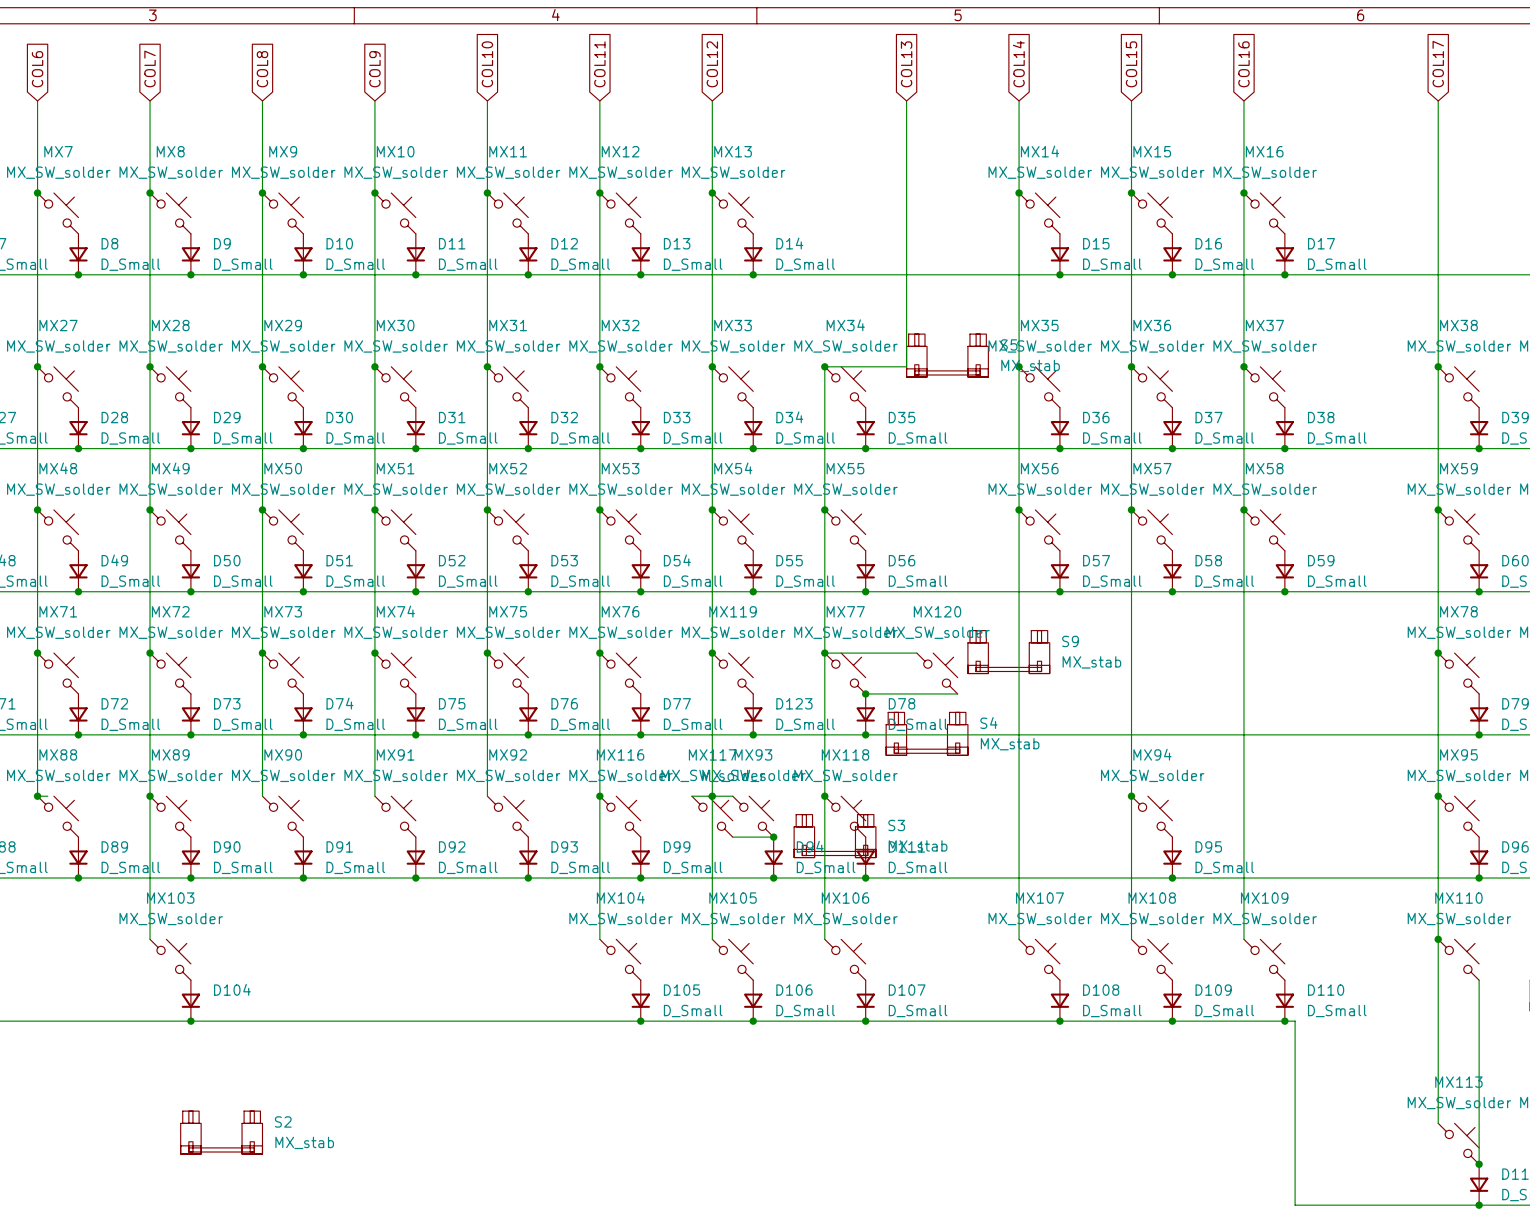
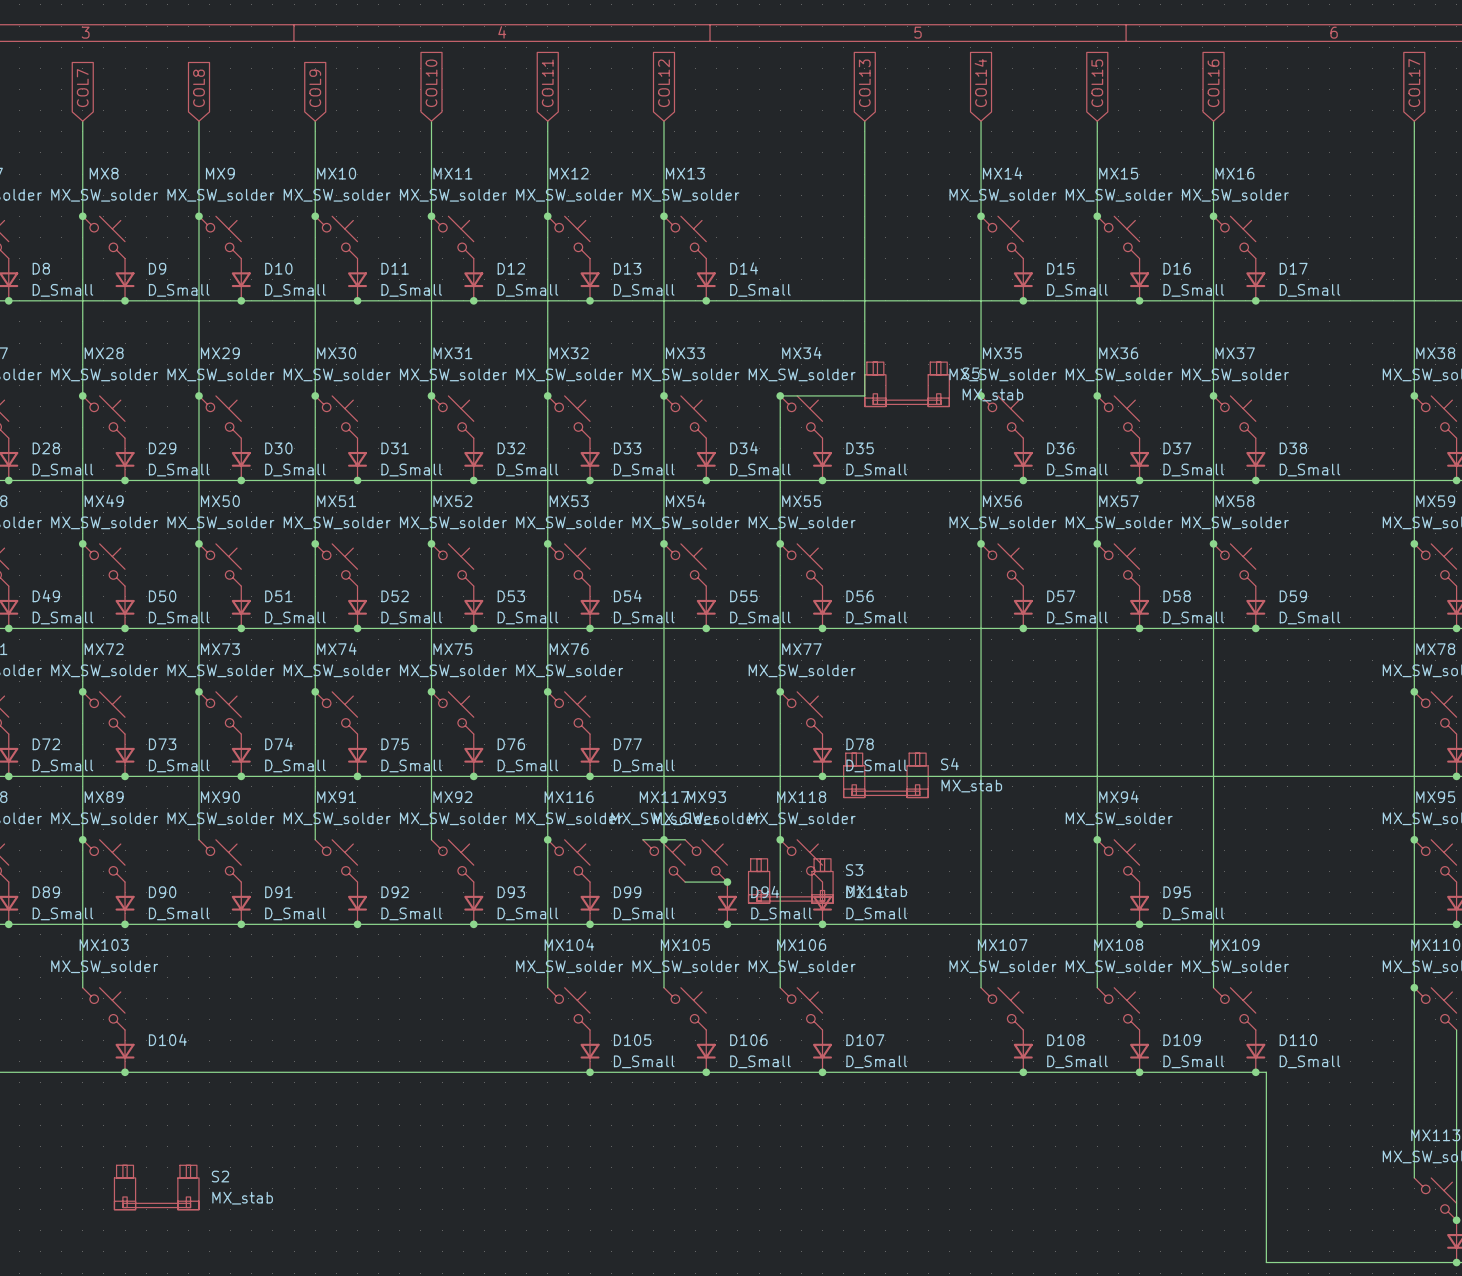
S9: MX_stab (1008, 652) -> none
junction: (712, 653) -> none
wire: (824, 653) (916, 653) -> none
MX119: MX_SW_solder (732, 673) -> none
MX120: MX_SW_solder (937, 673) -> none
wire: (865, 693) (957, 693) -> none
junction: (865, 693) -> none
D123: D_Small (753, 714) -> none
junction: (753, 734) -> none

